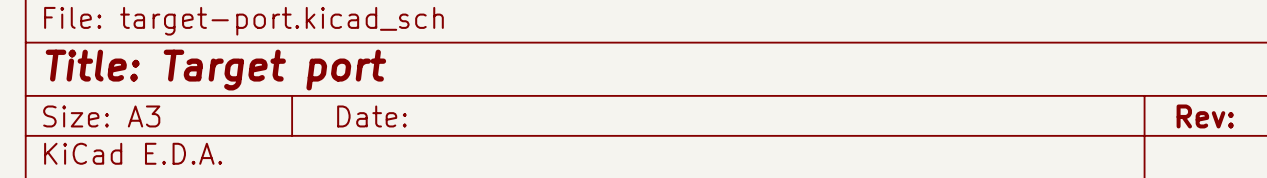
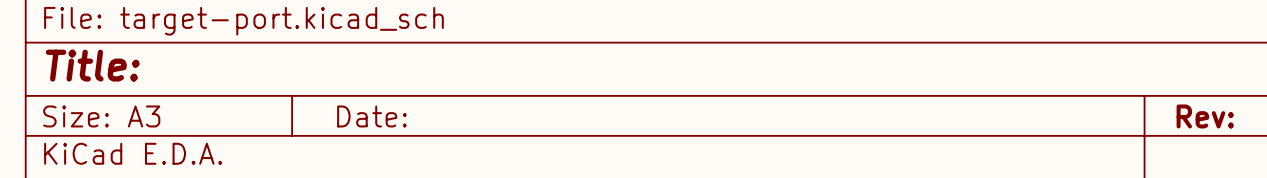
title block: Title: Target port (215, 70) -> Title: (92, 65)

